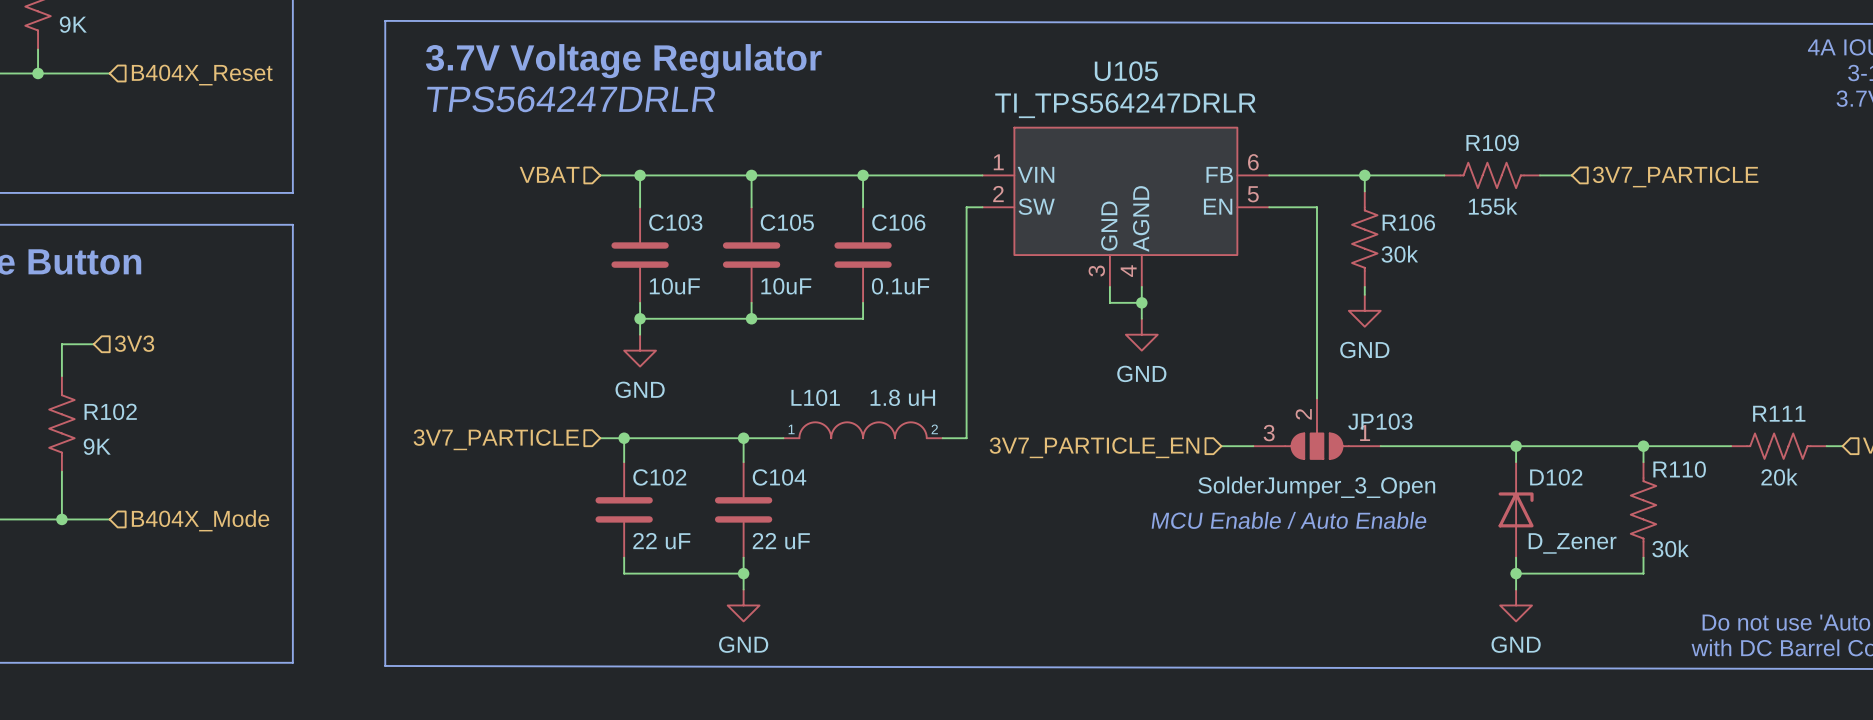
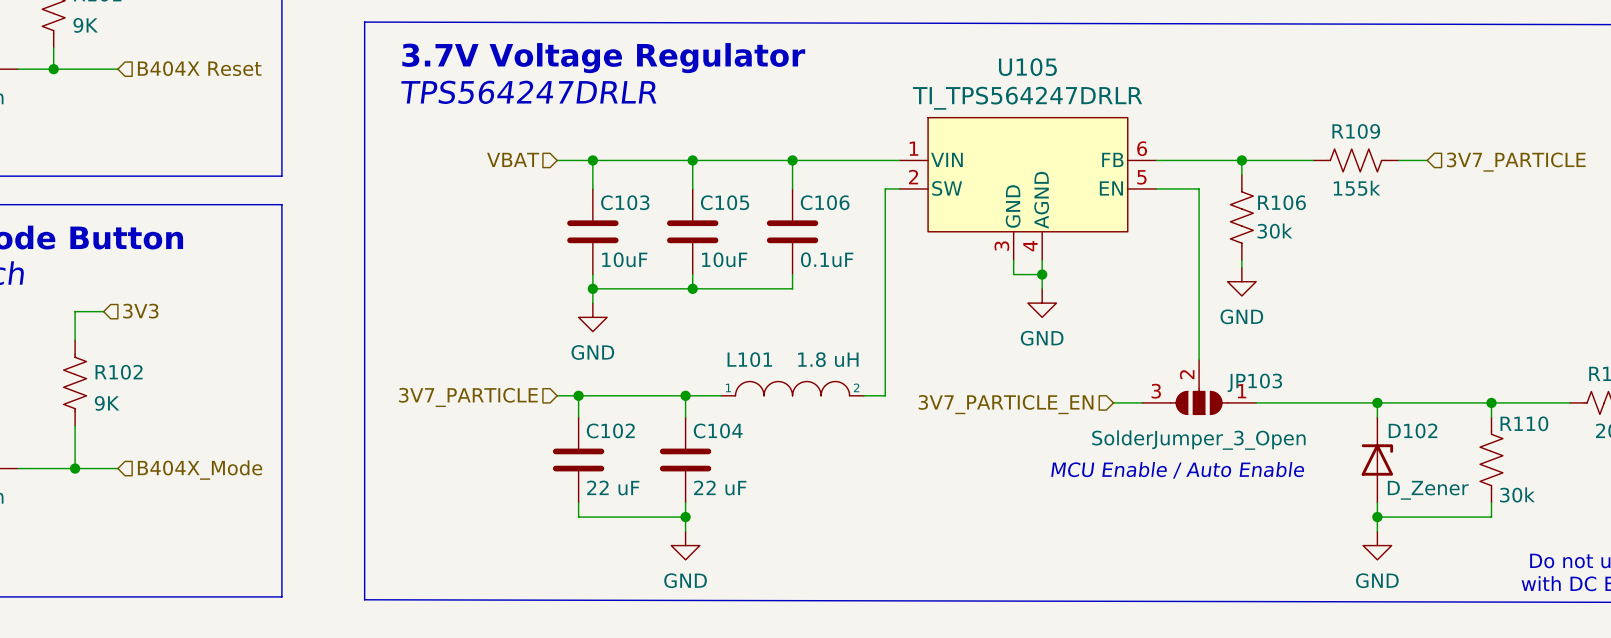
hierarchical label: B404X_Reset (202, 75) -> B404X Reset (199, 68)

